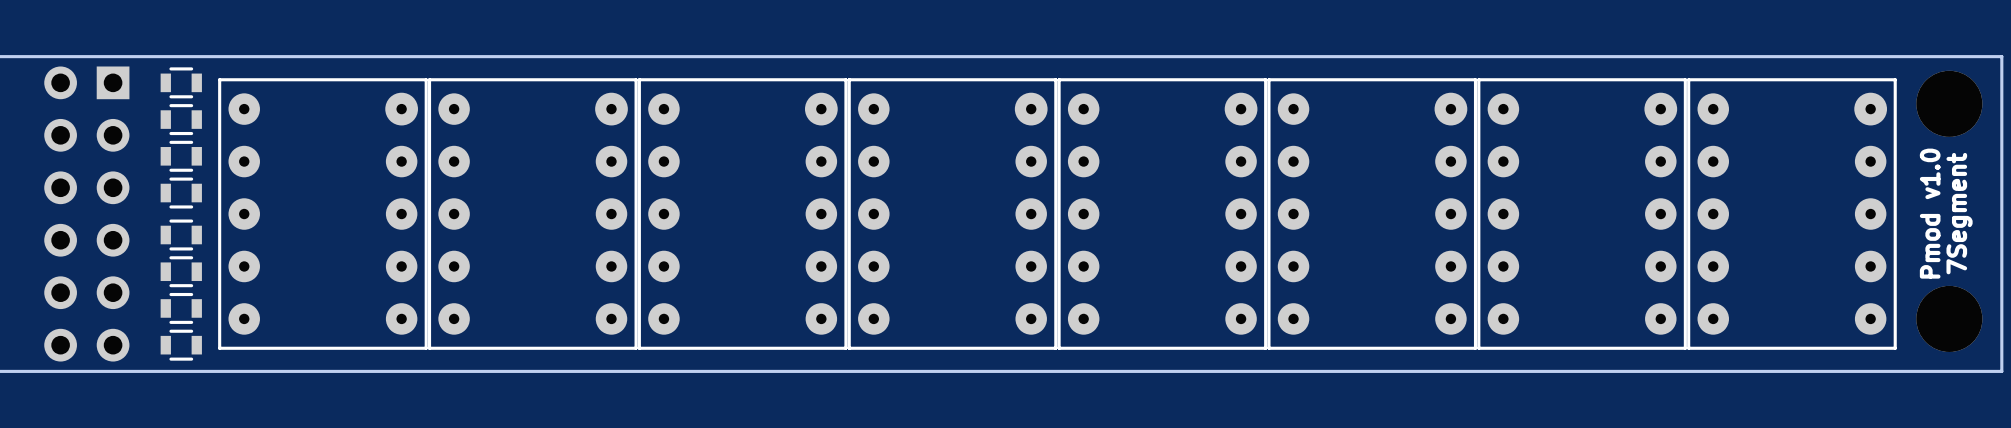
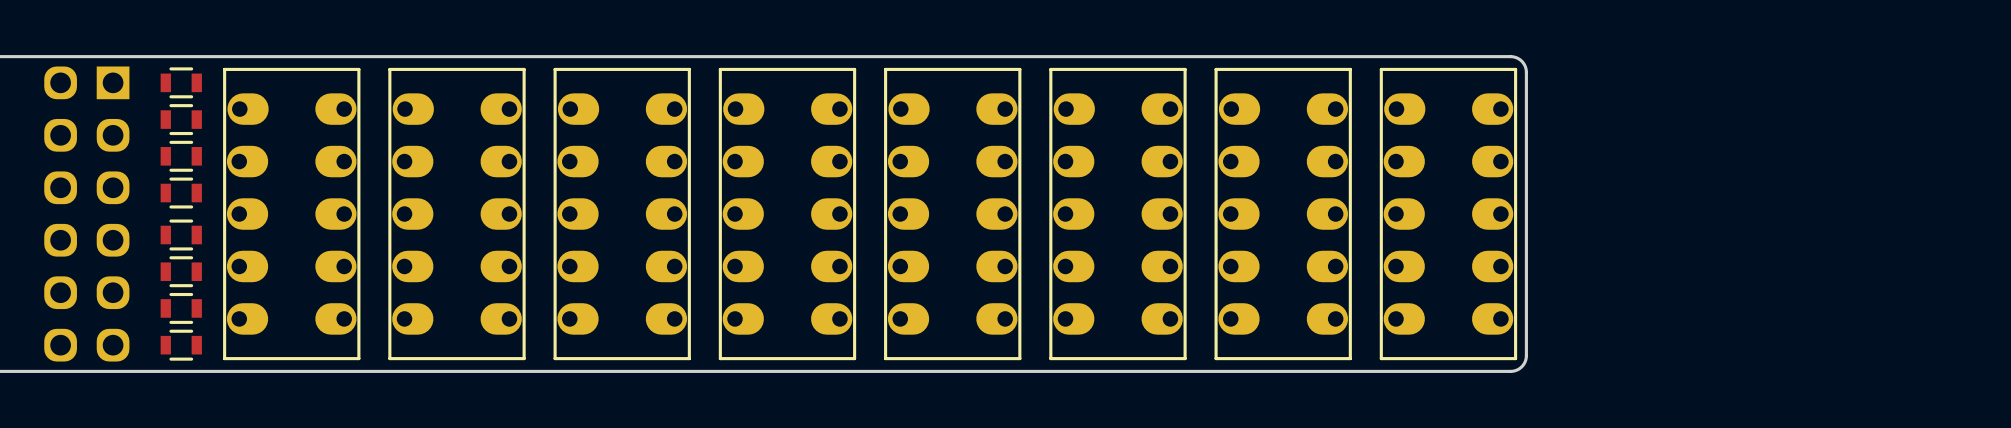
board edge: (1510, 56) (2001, 56) (2001, 371) (1510, 371) -> (1510, 56) (1521, 61) (1526, 72) (1526, 355) (1521, 366) (1510, 371)
part footprint: [44, 66, 130, 362] -> [44, 66, 130, 362]
part footprint: [847, 78, 1058, 350] -> [884, 67, 1022, 361]
part: (1949, 103) -> none
text: Pmod v1.0 (1930, 213) -> none
text: 7Segment (1959, 213) -> none
part: none -> (291, 214)
part: (322, 214) -> none
part: none -> (456, 214)
part: (532, 214) -> none
part: none -> (622, 214)
part: (742, 214) -> none
part: none -> (787, 214)
part: none -> (1117, 214)
part: (1162, 214) -> none
part: none -> (1283, 214)
part: (1372, 214) -> none
part: none -> (1448, 214)
part: (1582, 214) -> none
part: (1791, 214) -> none
part: (1949, 318) -> none

